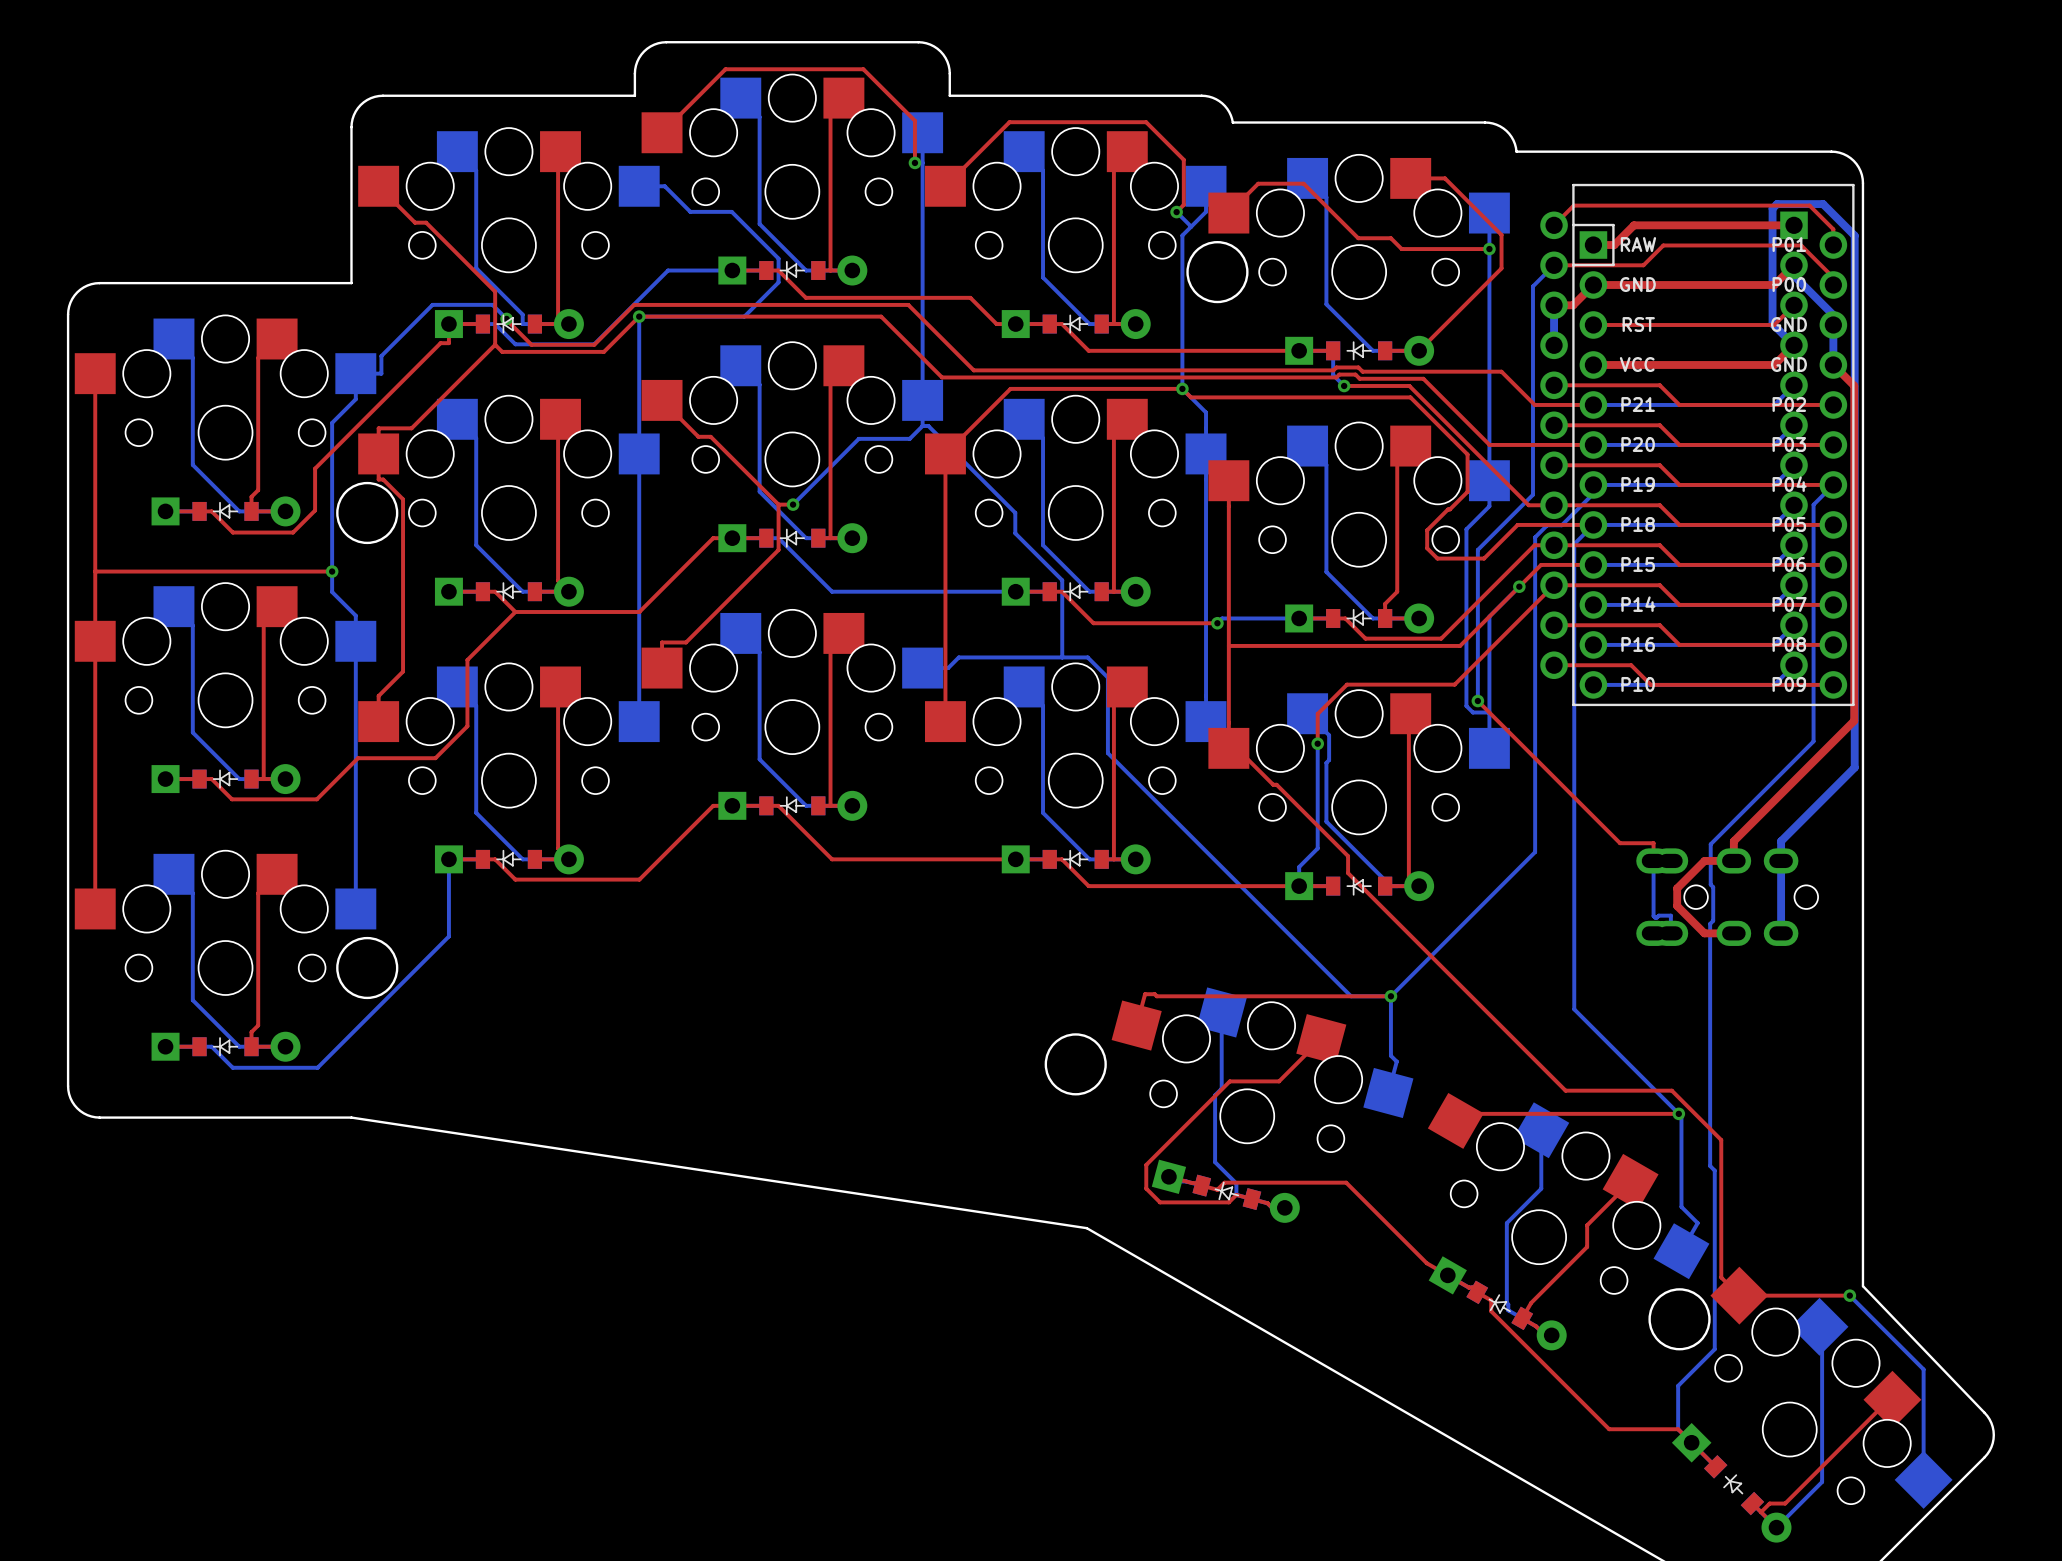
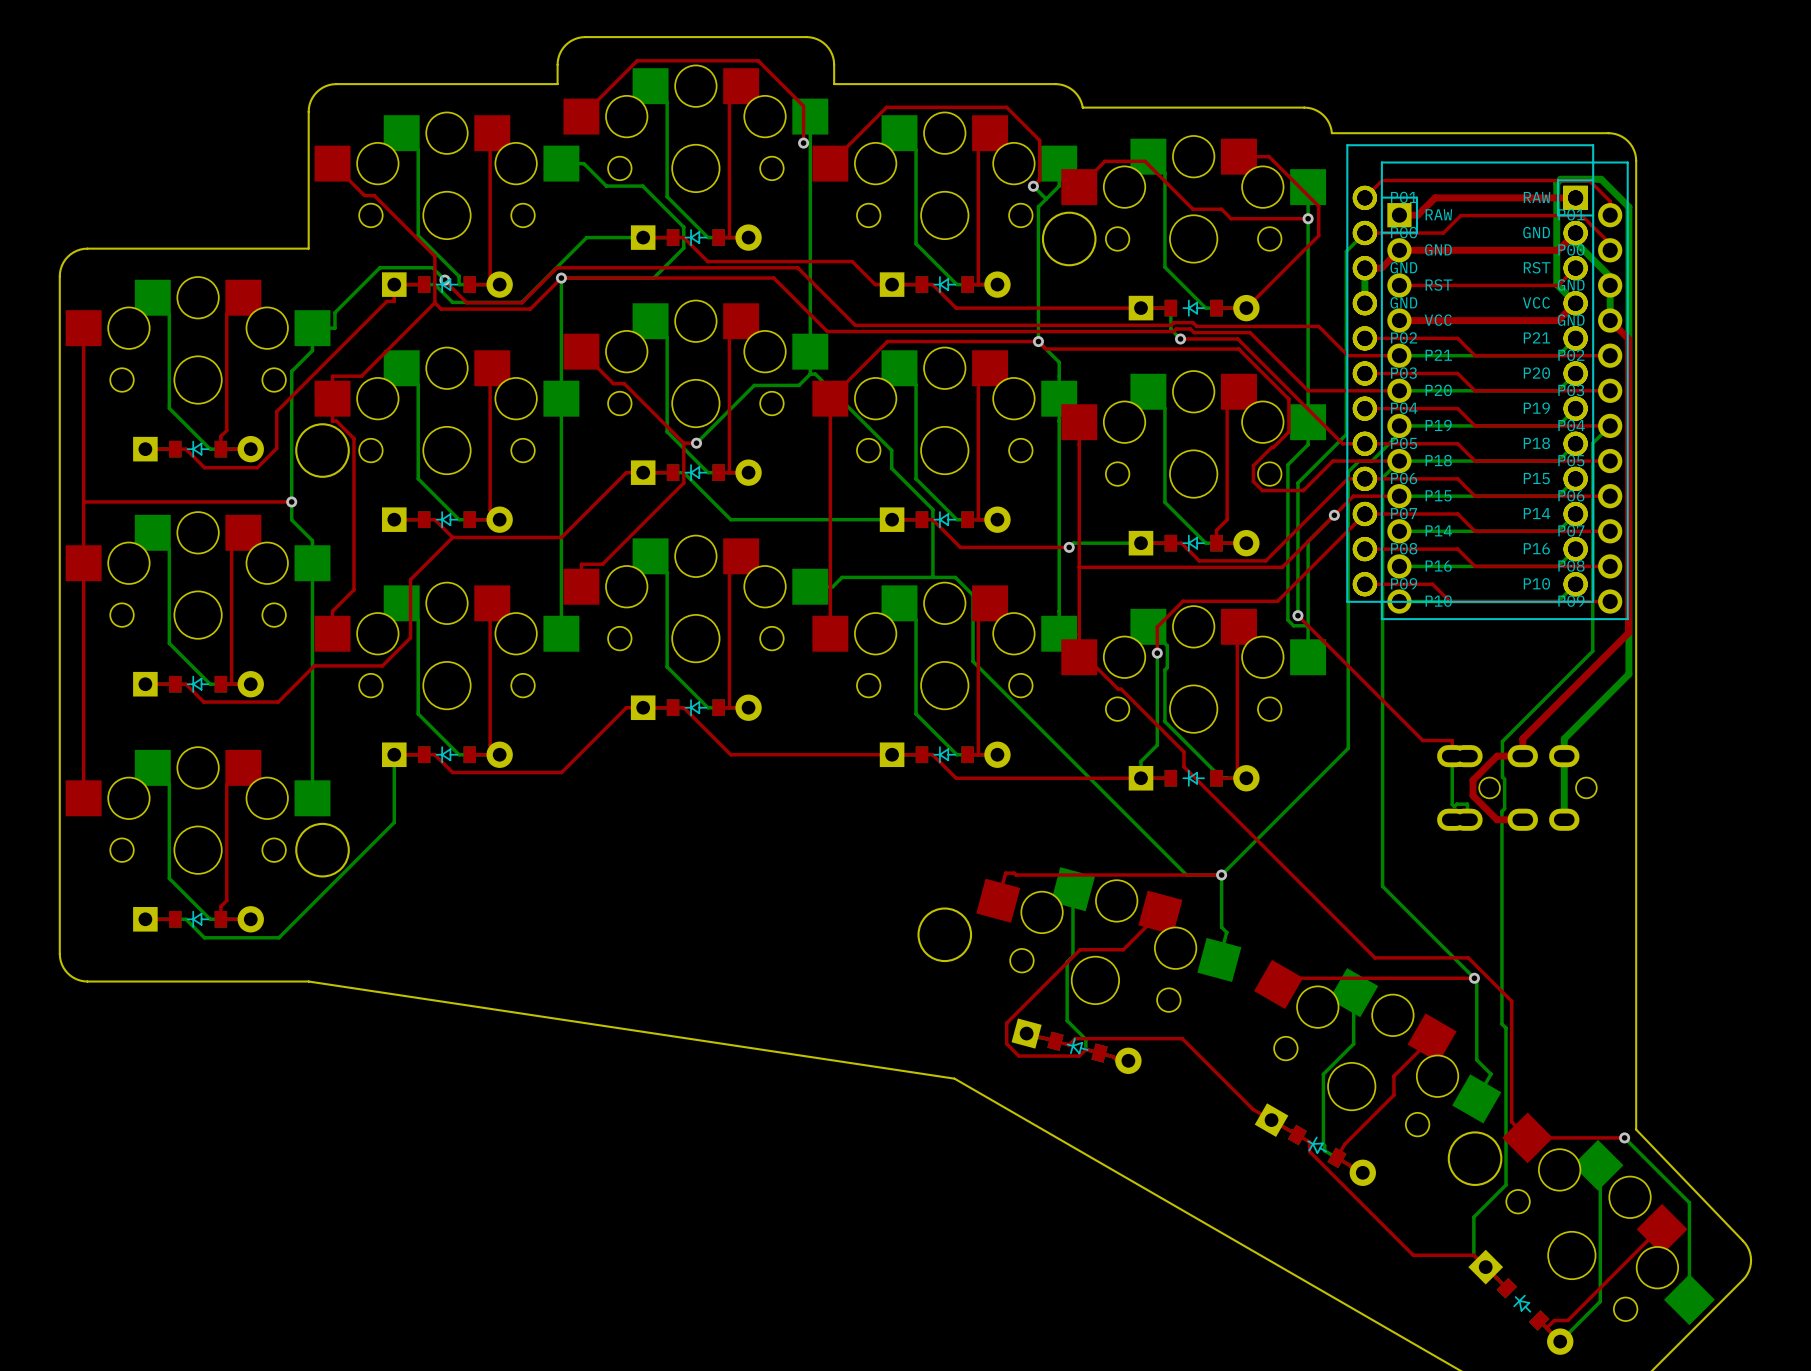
part: none -> (1470, 373)

